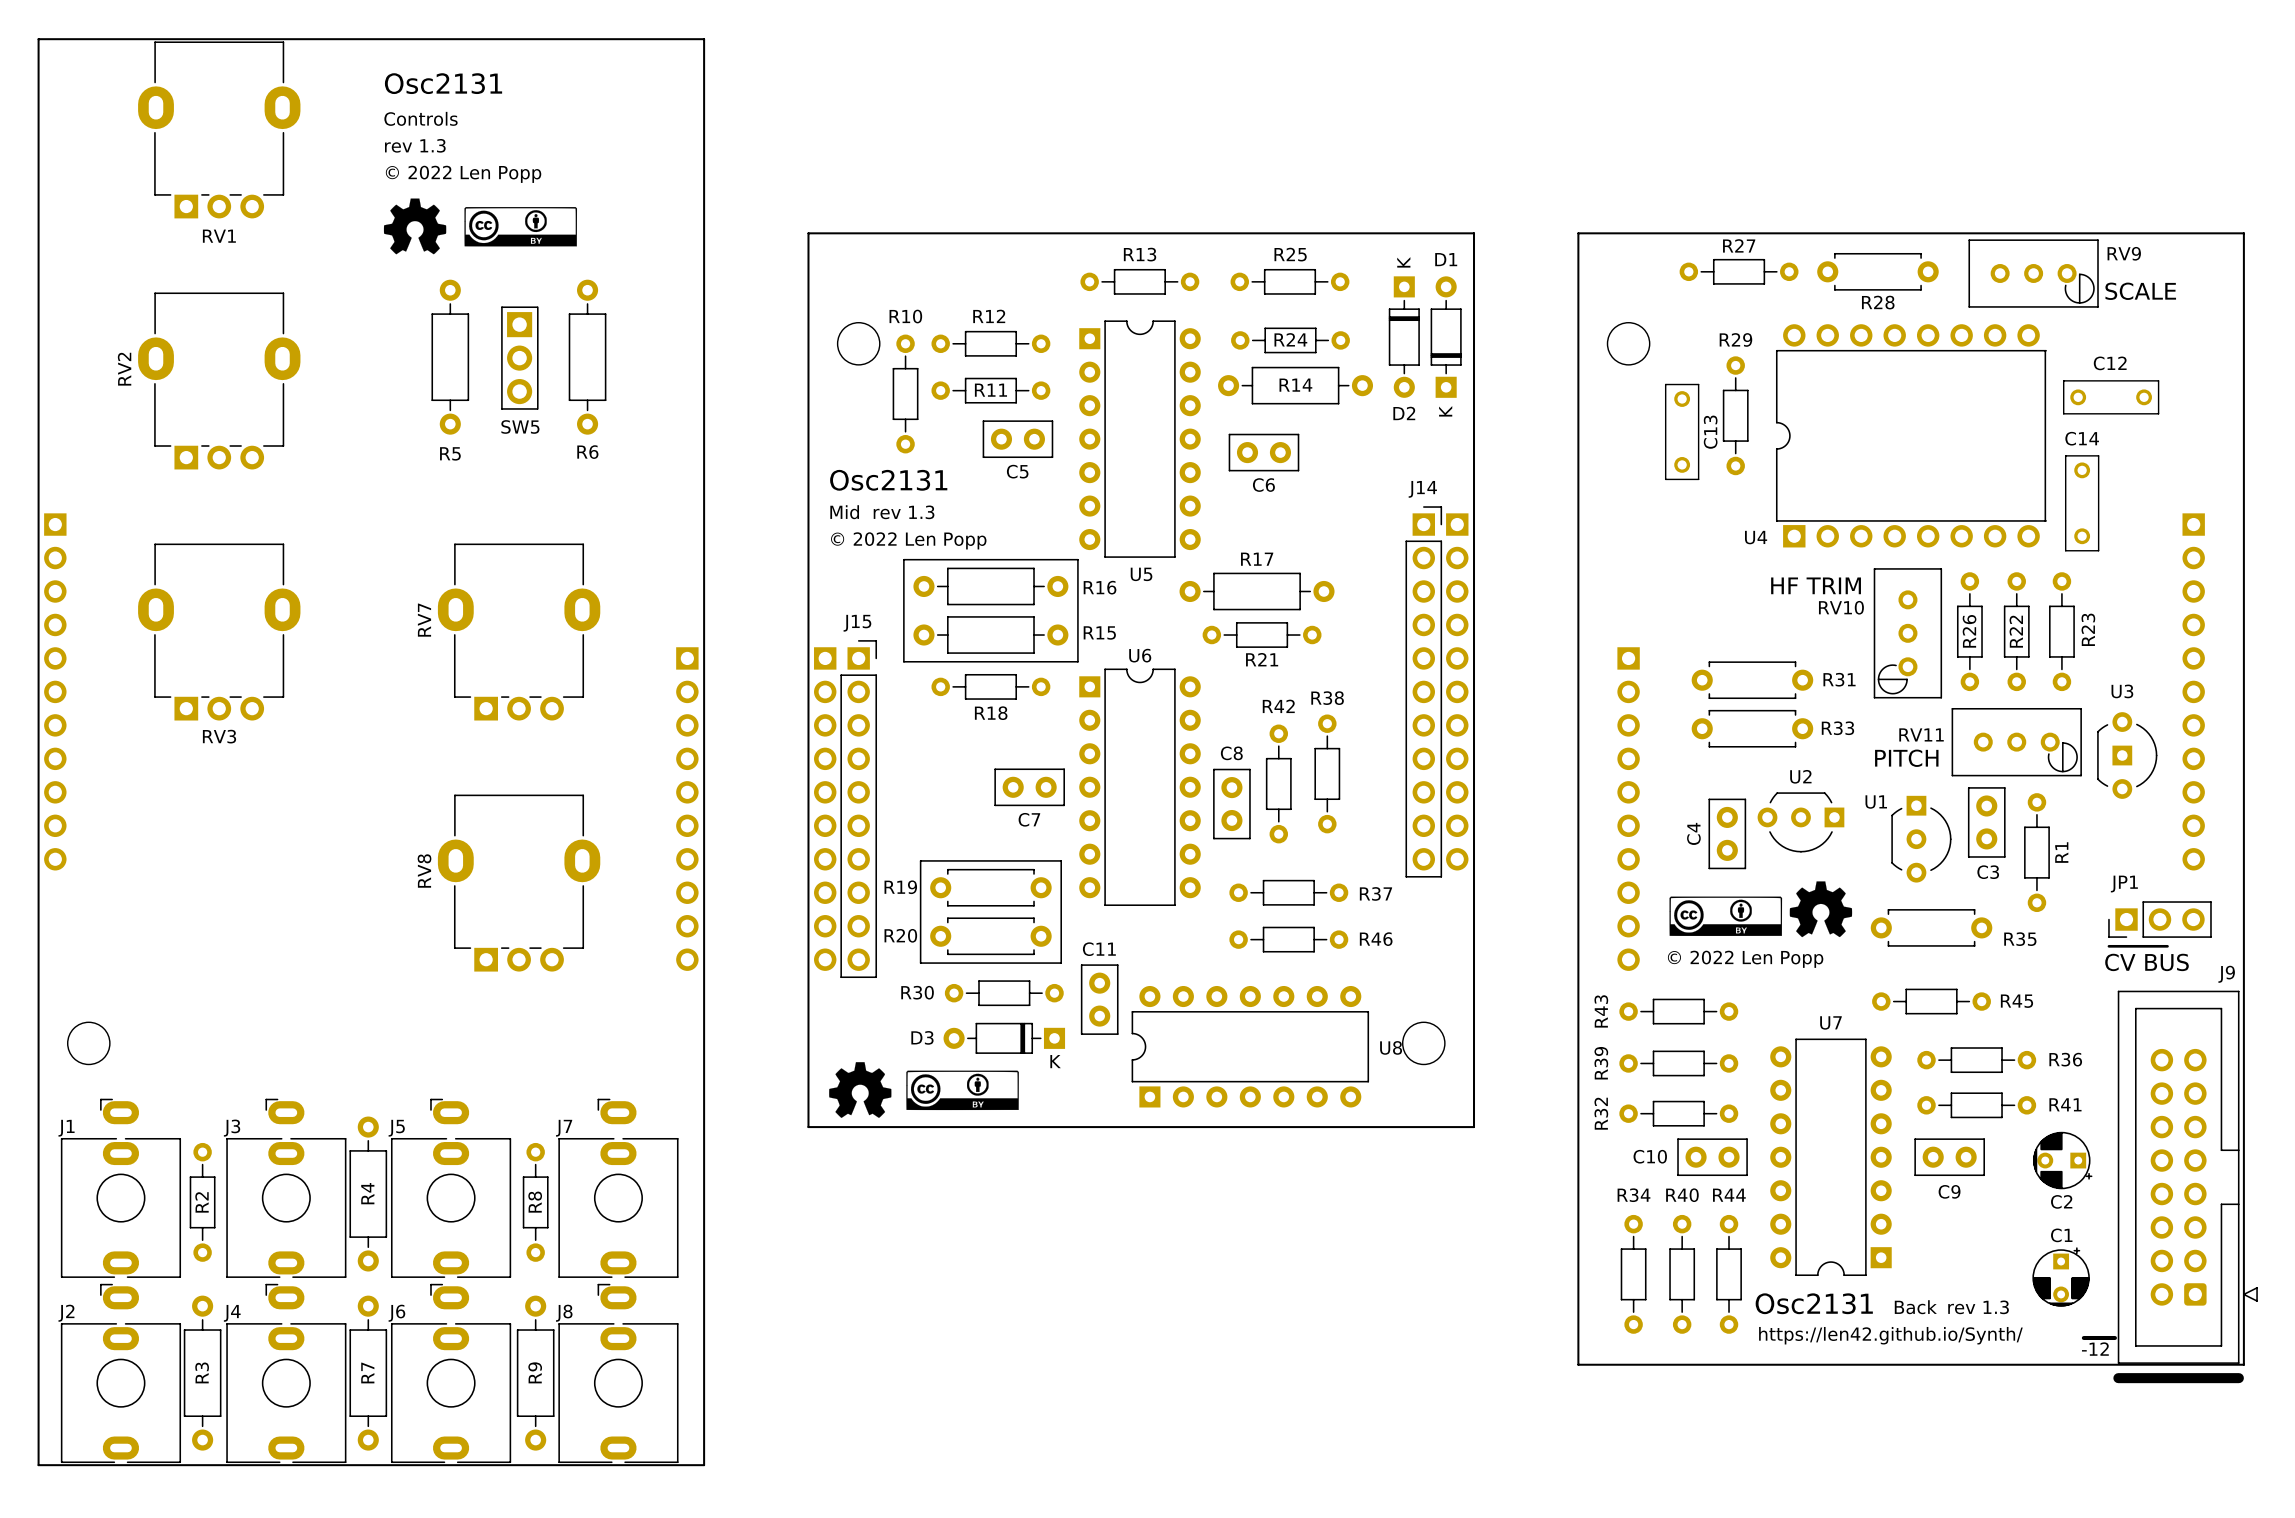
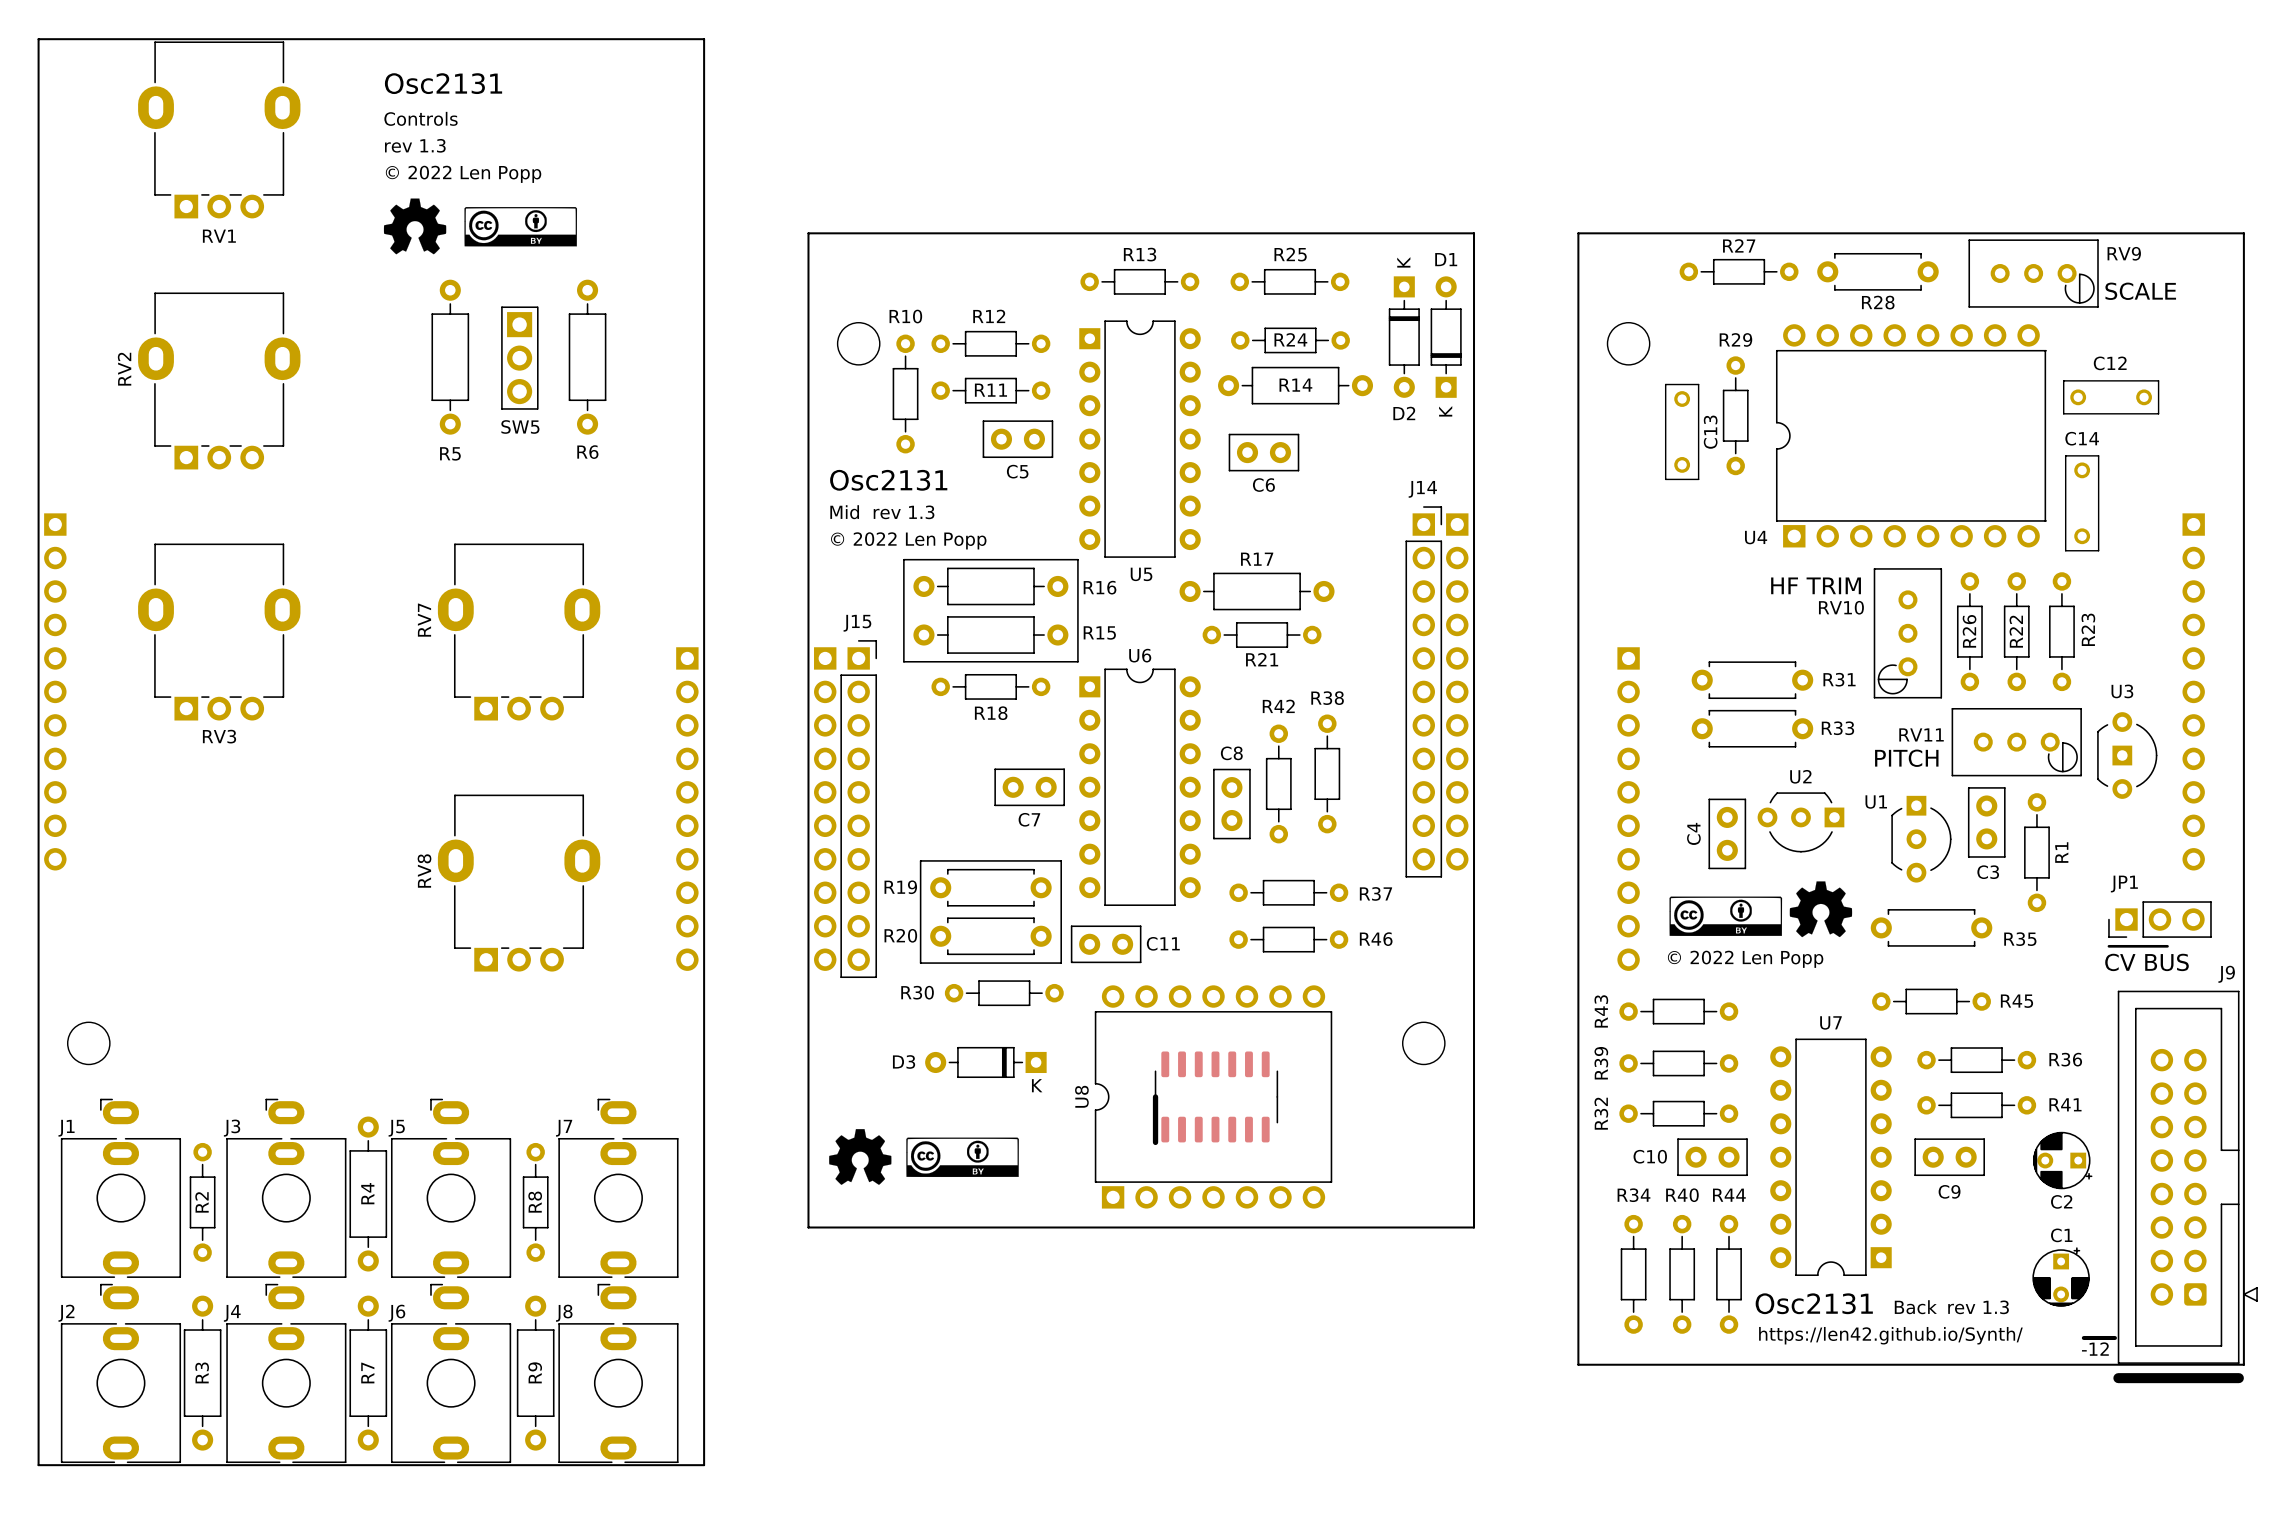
U8 footprint: [1131, 985, 1370, 1108] -> [1094, 985, 1333, 1209]
C11 rotation: 0° (1099, 999) -> 90° clockwise (1106, 944)
C11 position: (1099, 999) -> (1106, 944)
D3 position: (1004, 1038) -> (985, 1062)
U8 name position: U8 (1391, 1047) -> U8 (1081, 1096)
drawing position: (860, 1090) -> (860, 1156)
drawing position: (962, 1090) -> (962, 1157)
board edge: (808, 1127) (1474, 1127) -> (808, 1127) (808, 1227) (1474, 1227) (1474, 1127)

